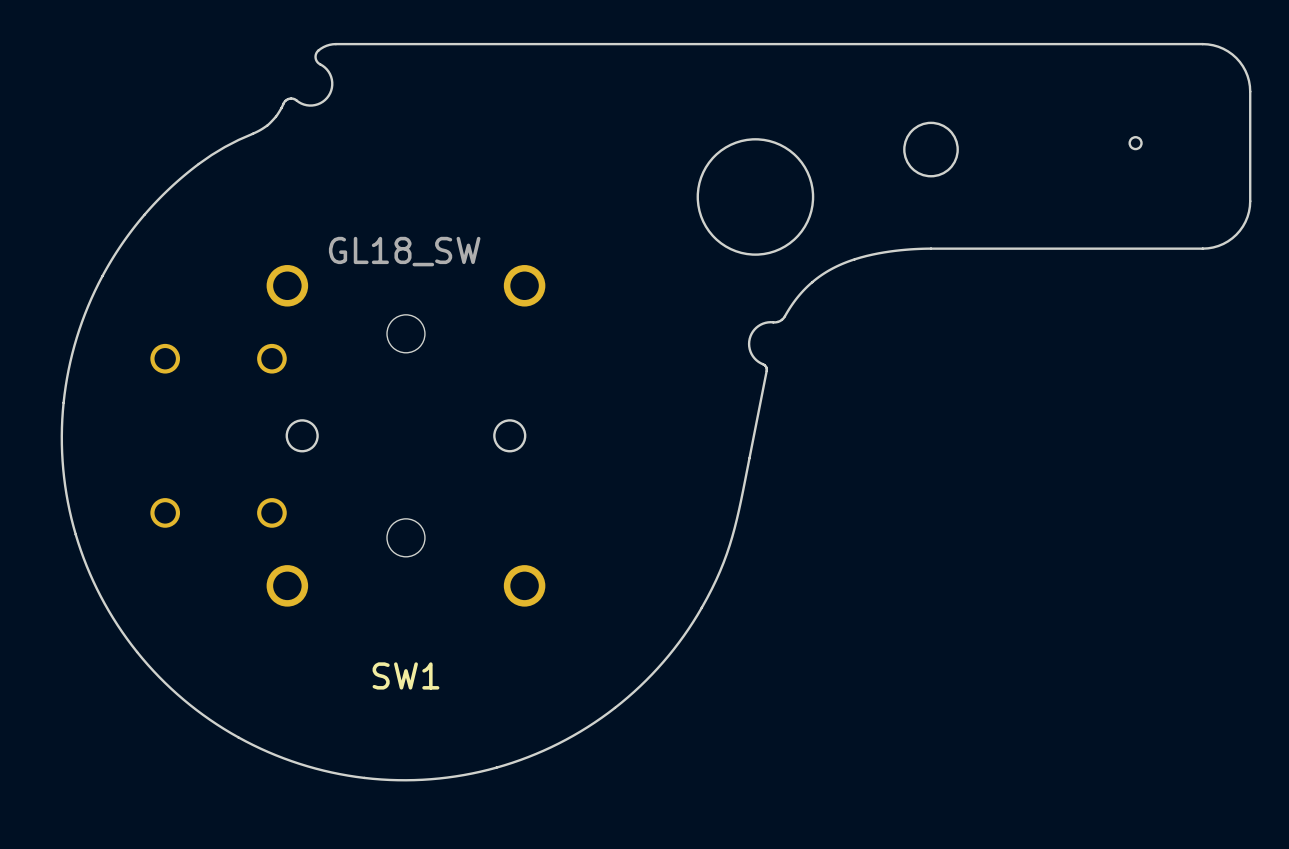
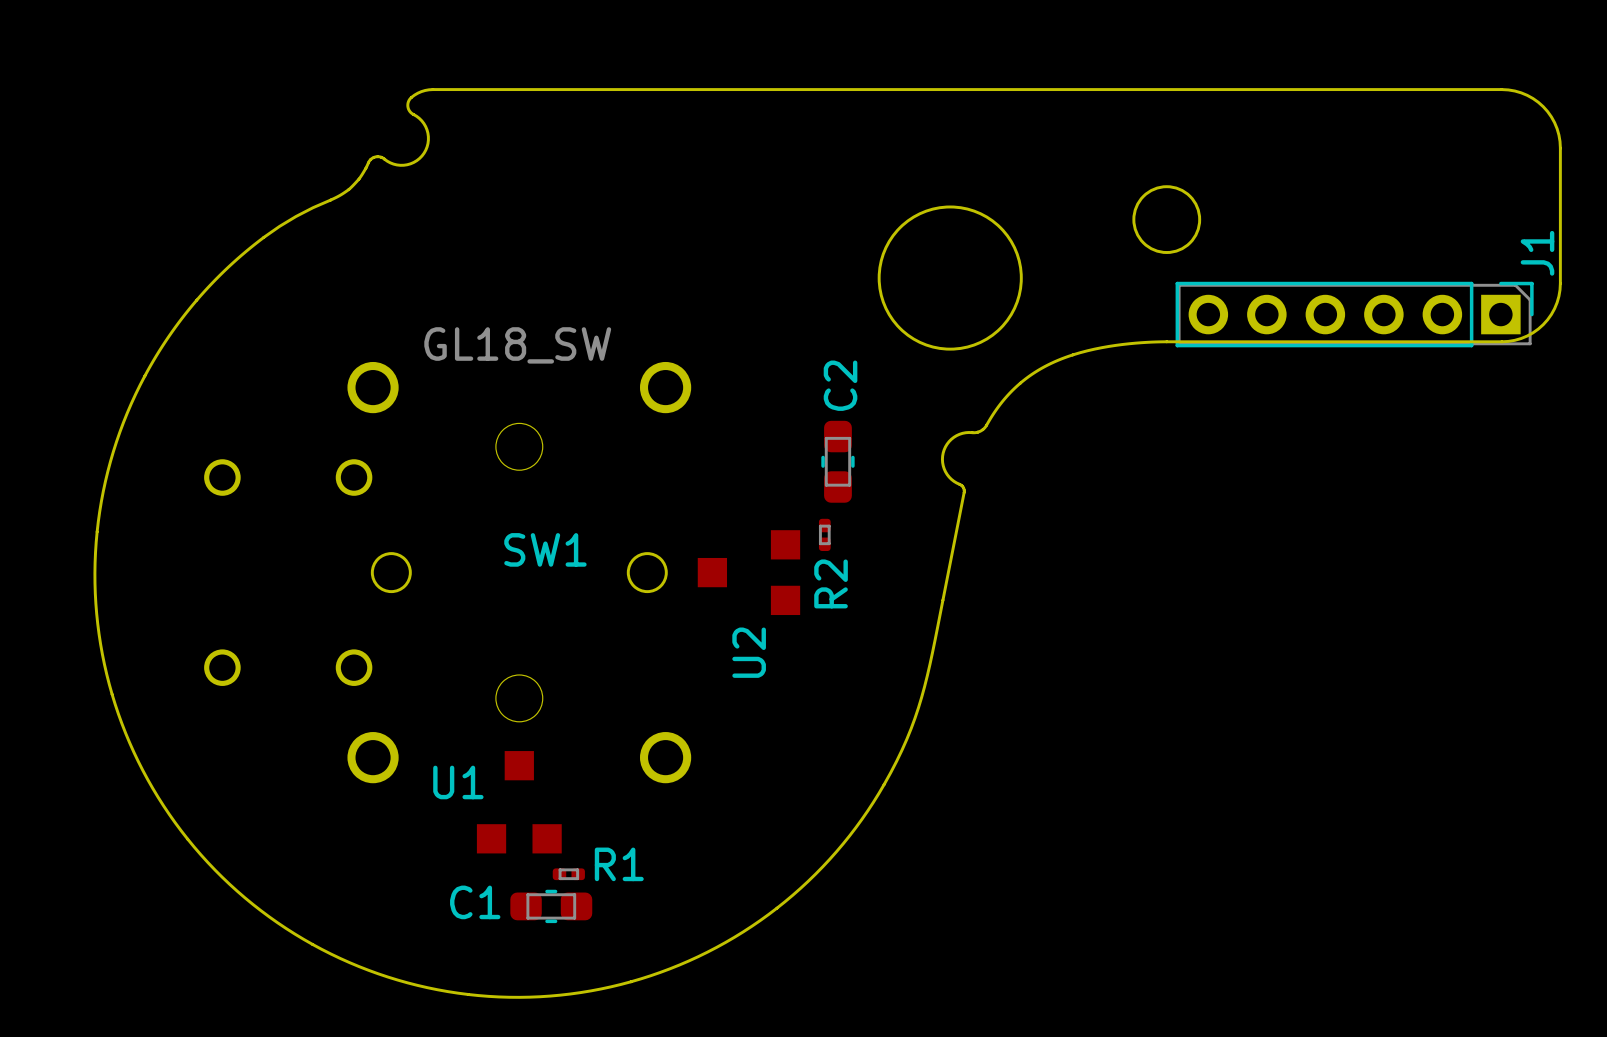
round board edge: [1128, 136, 1143, 151] -> none
J1: none -> (1354, 314)
C2: none -> (837, 461)
R2: none -> (824, 534)
U2: none -> (748, 572)
U1: none -> (519, 802)
SW1 name position: SW1 (405, 675) -> SW1 (545, 549)
R1: none -> (568, 874)
C1: none -> (551, 906)

